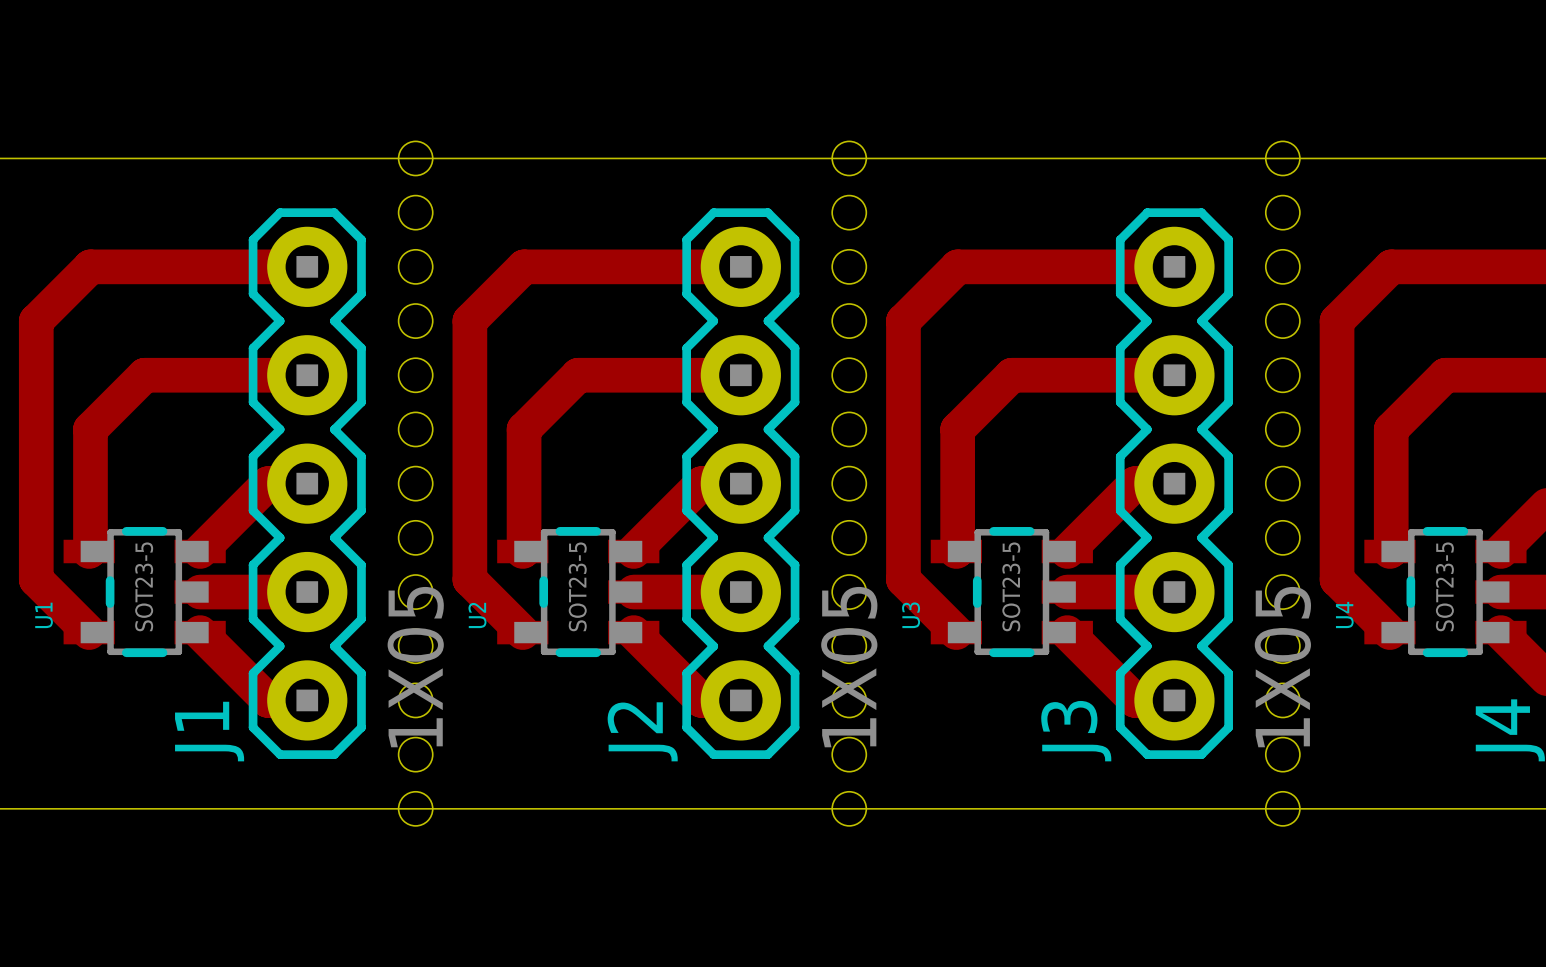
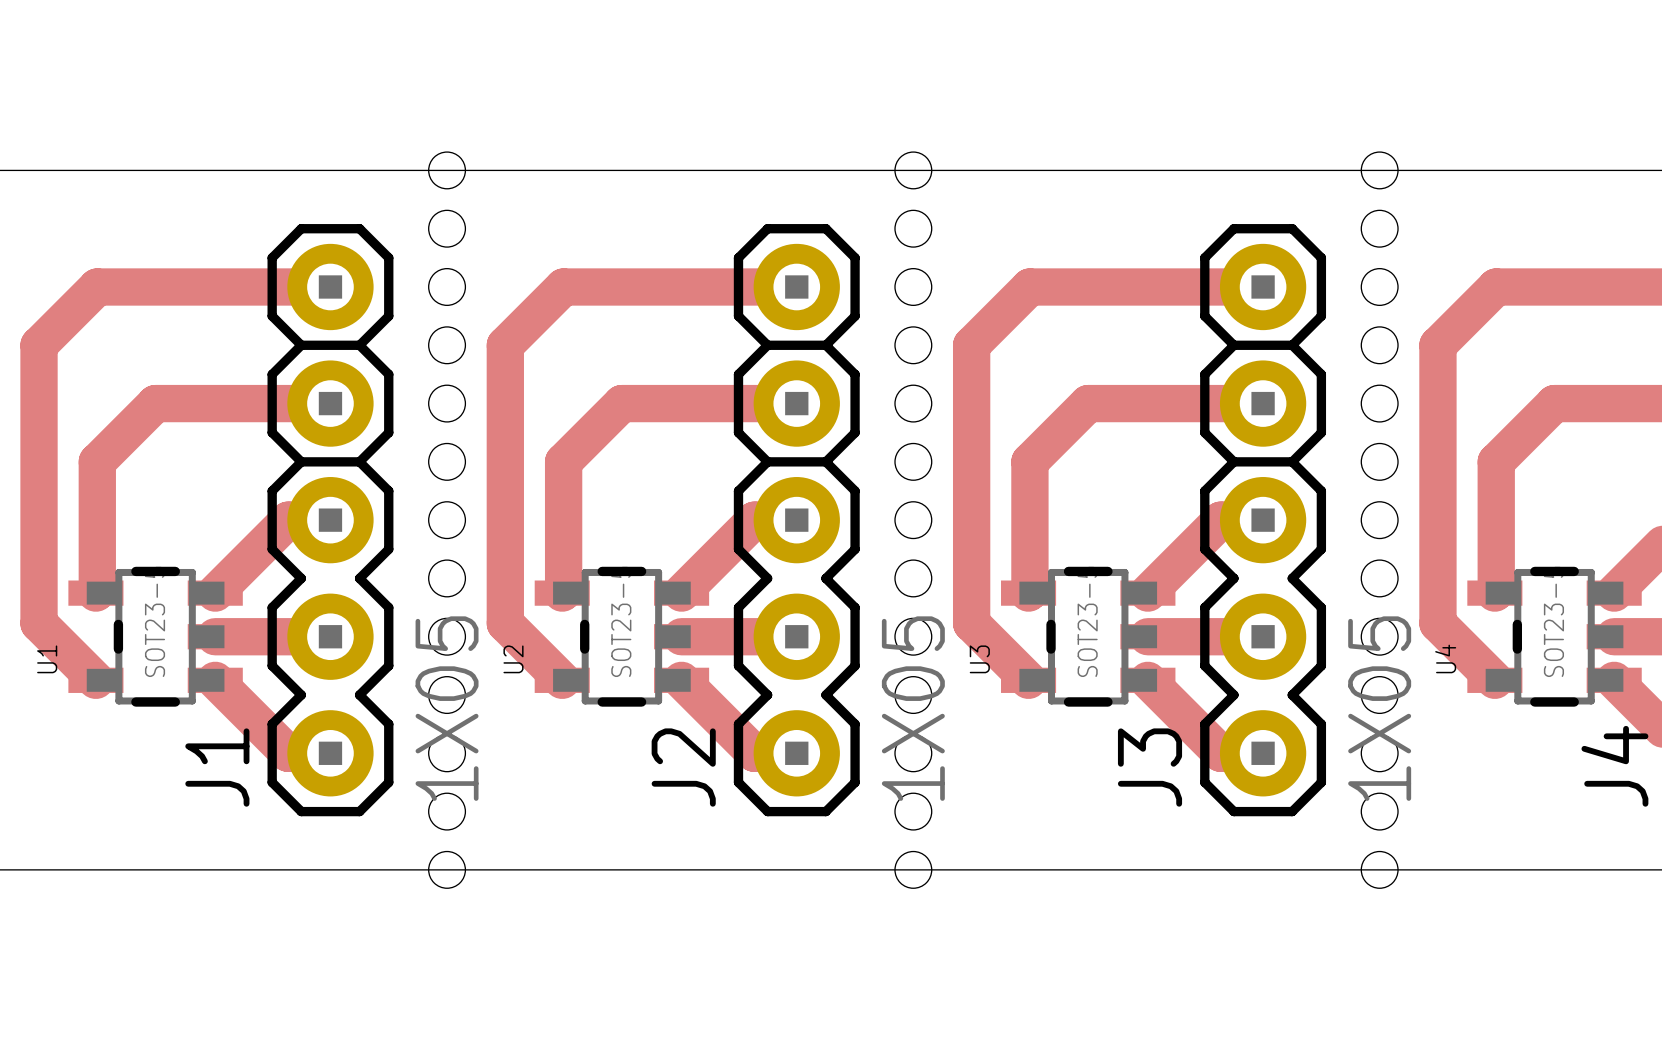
J1 footprint: [248, 208, 366, 759] -> [267, 224, 394, 817]
J2 footprint: [682, 208, 800, 759] -> [733, 224, 860, 817]
J3 footprint: [1115, 208, 1233, 759] -> [1200, 224, 1327, 817]

